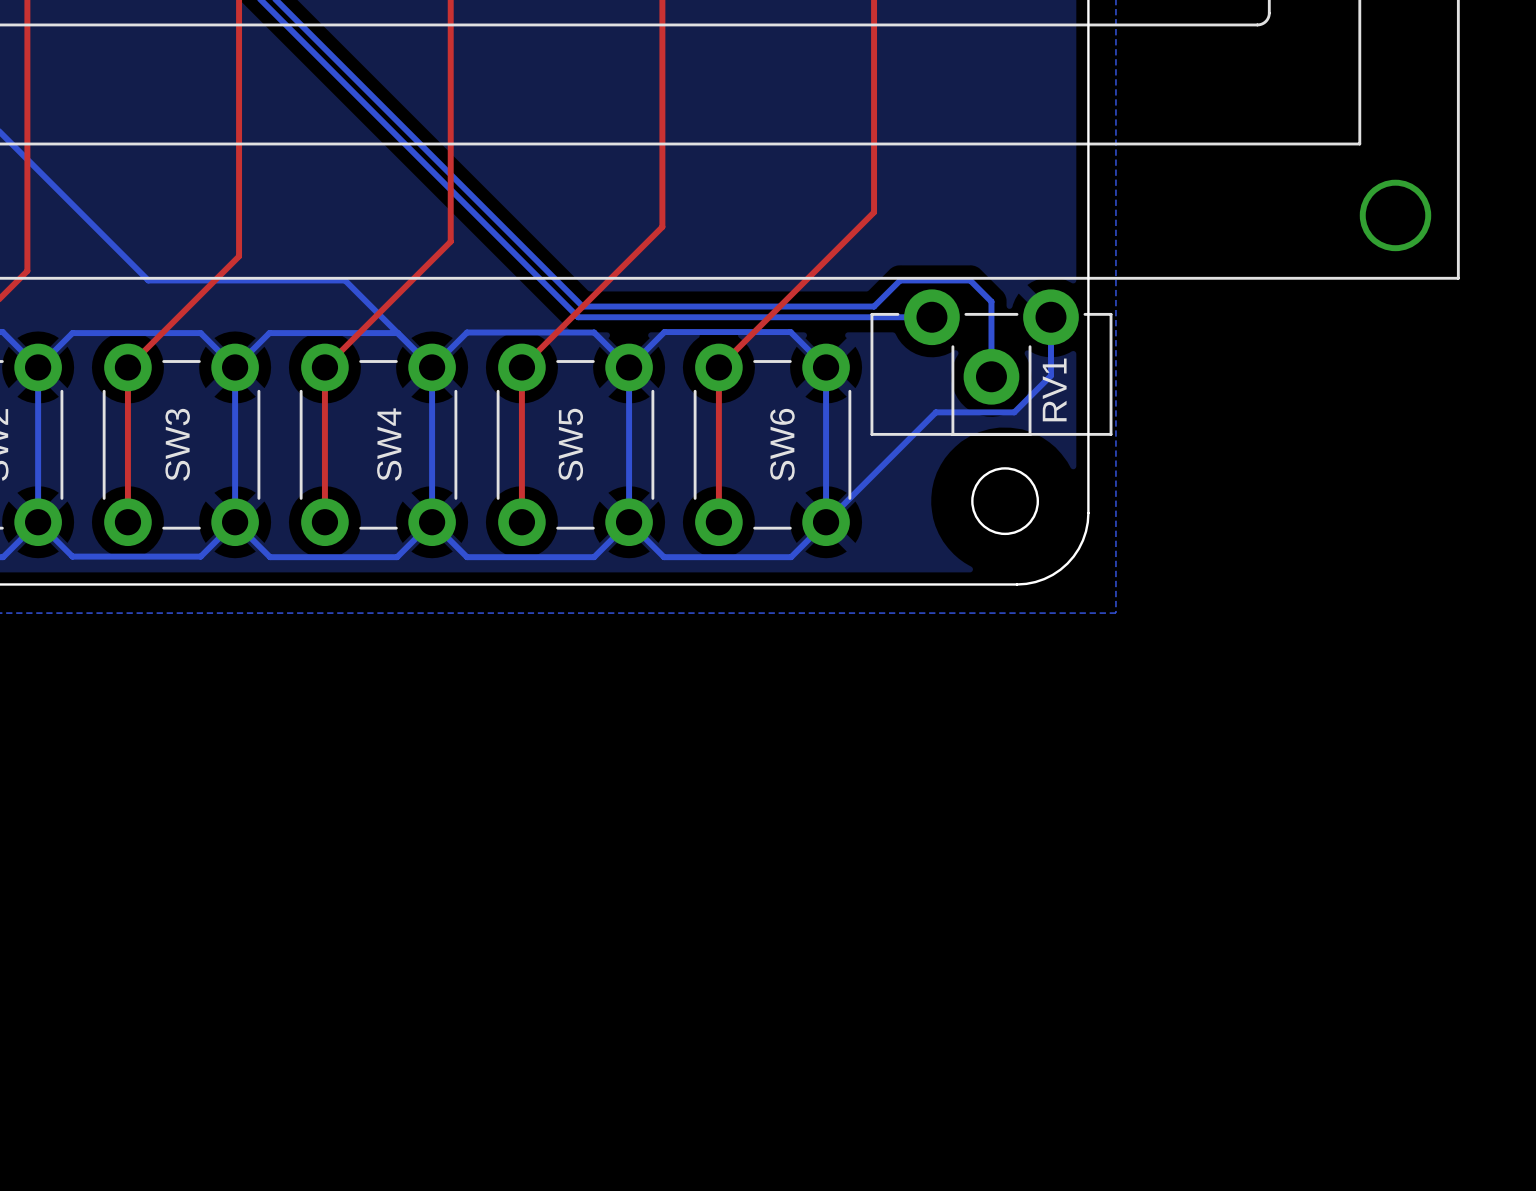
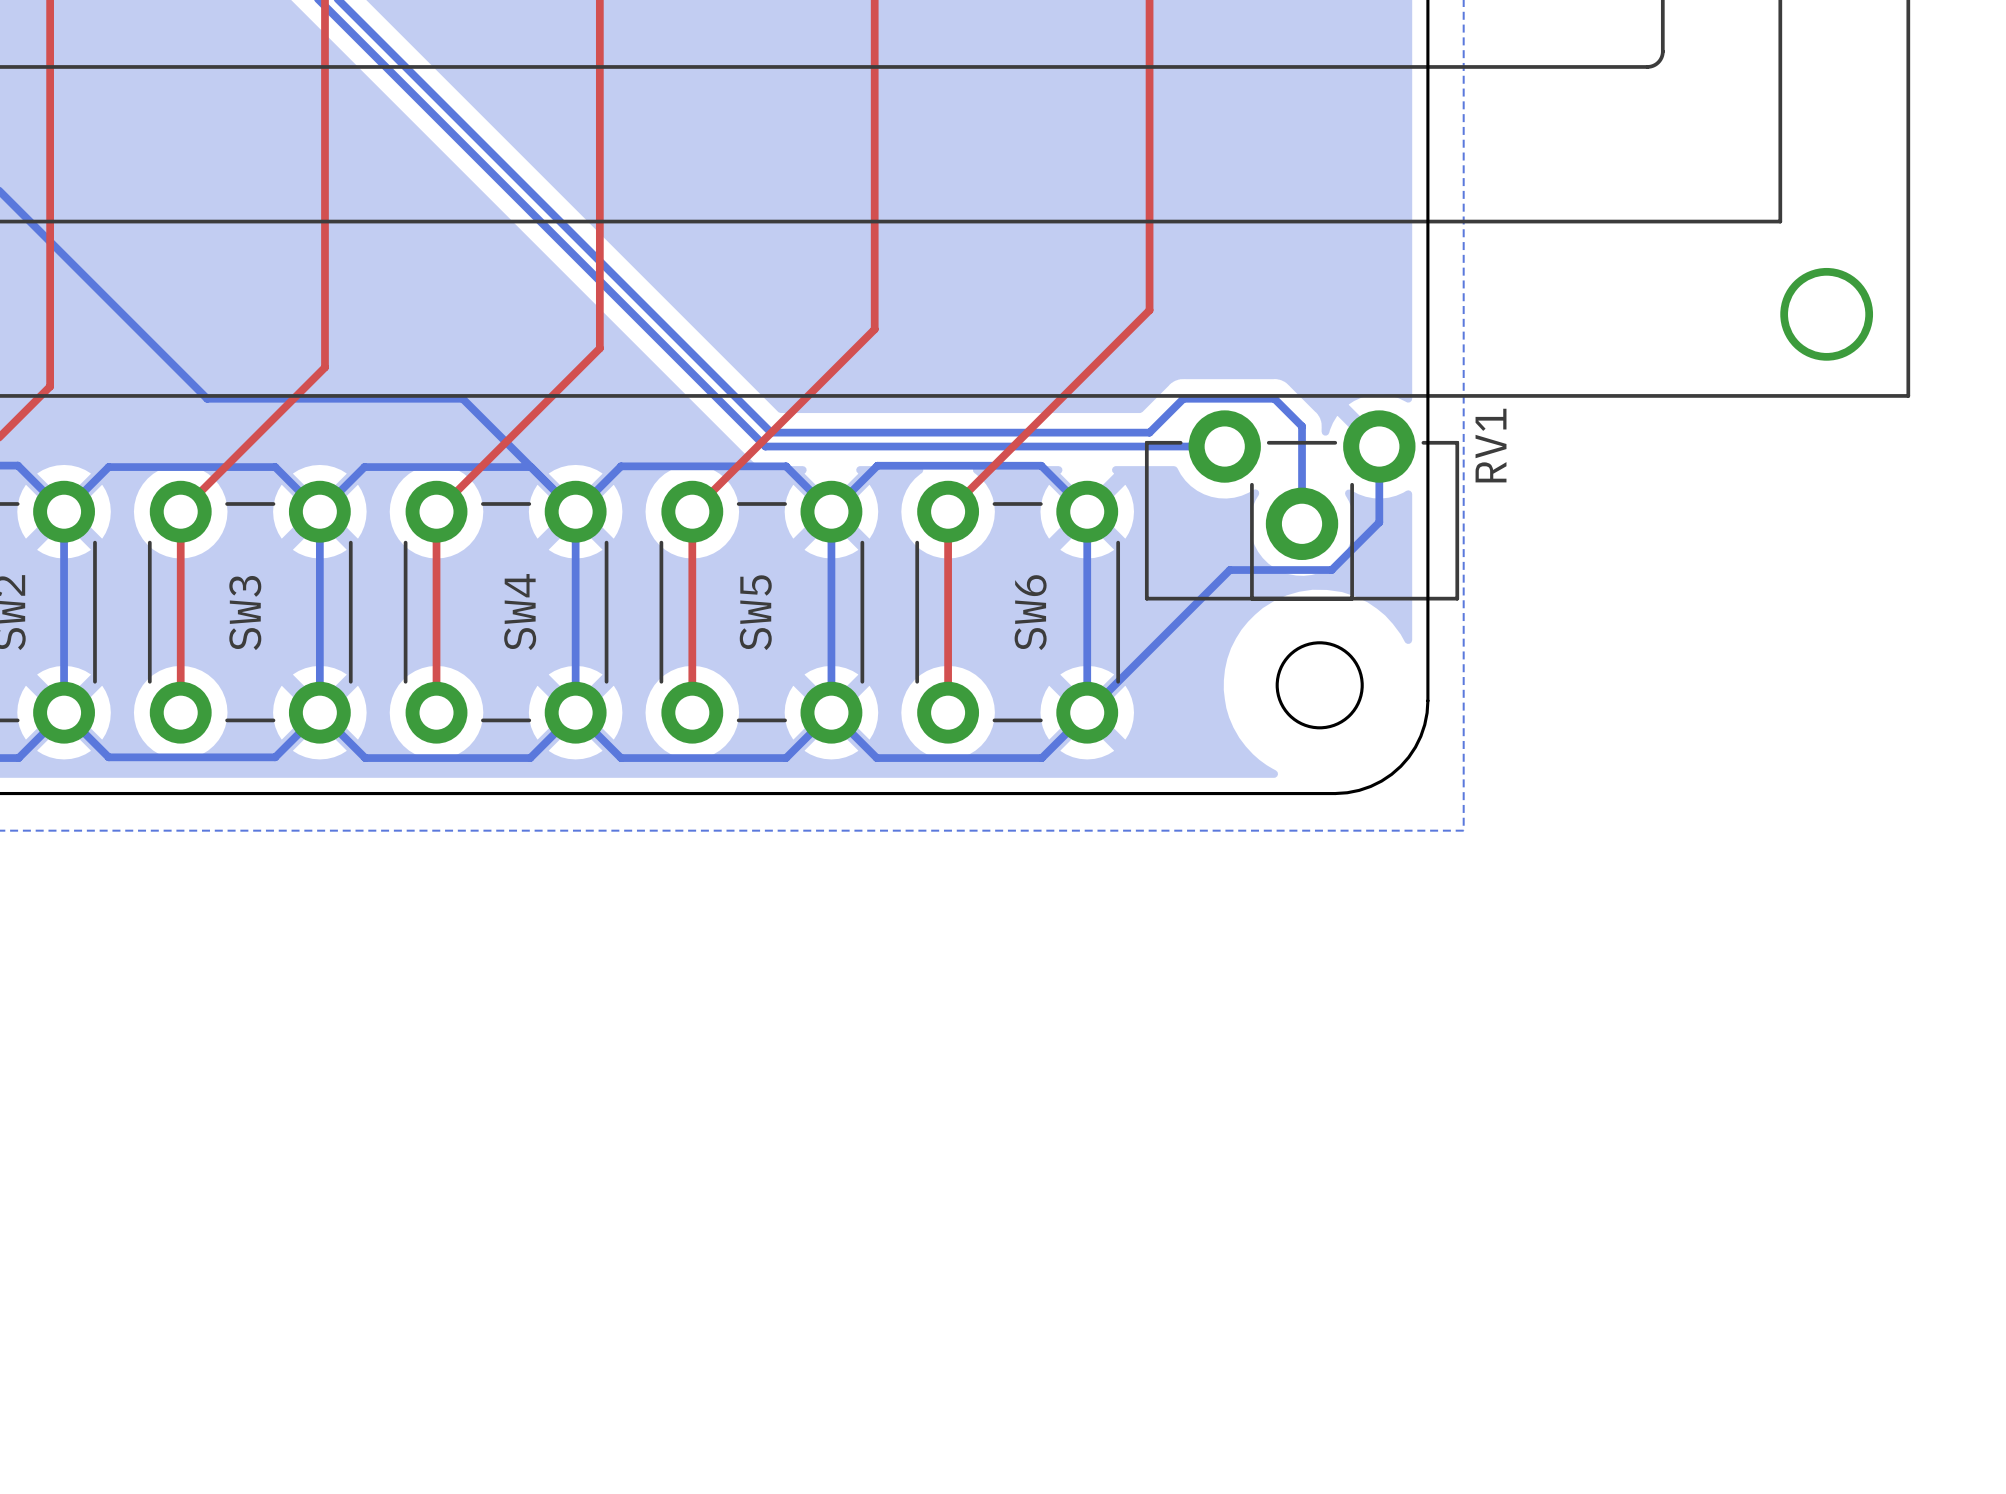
RV1 name position: RV1 (1054, 389) -> RV1 (1491, 445)

